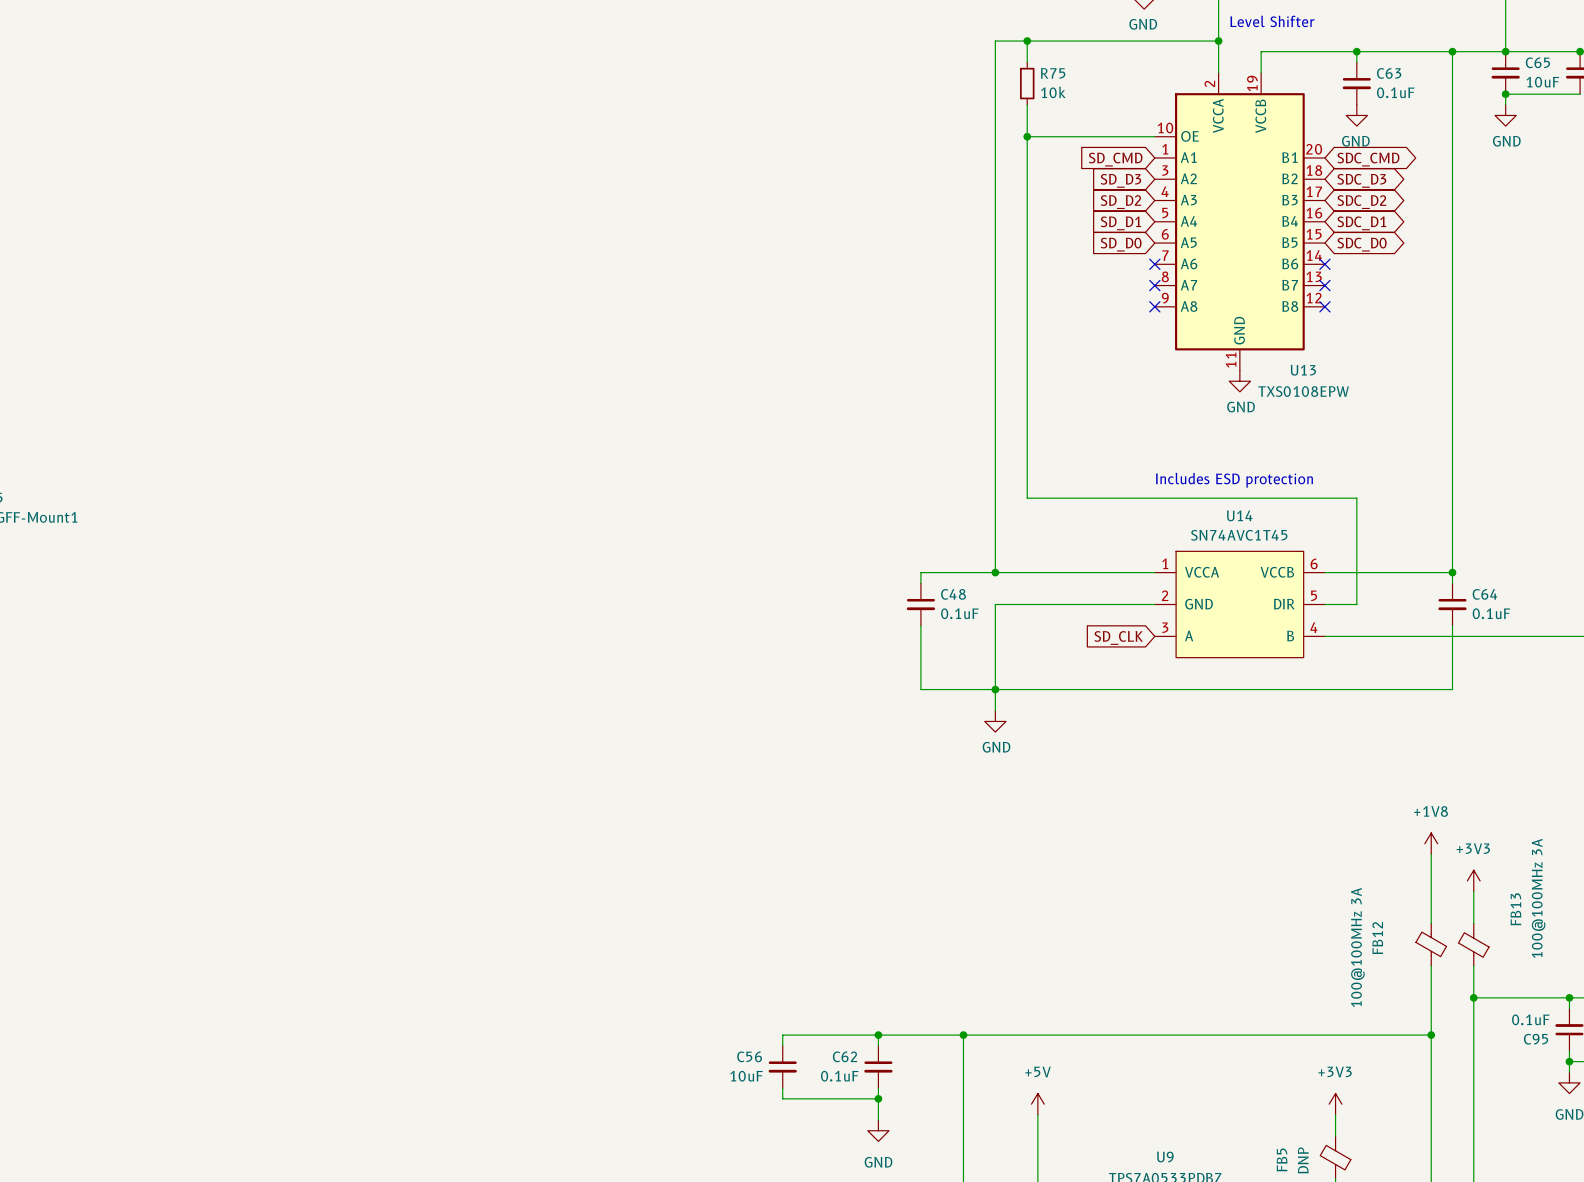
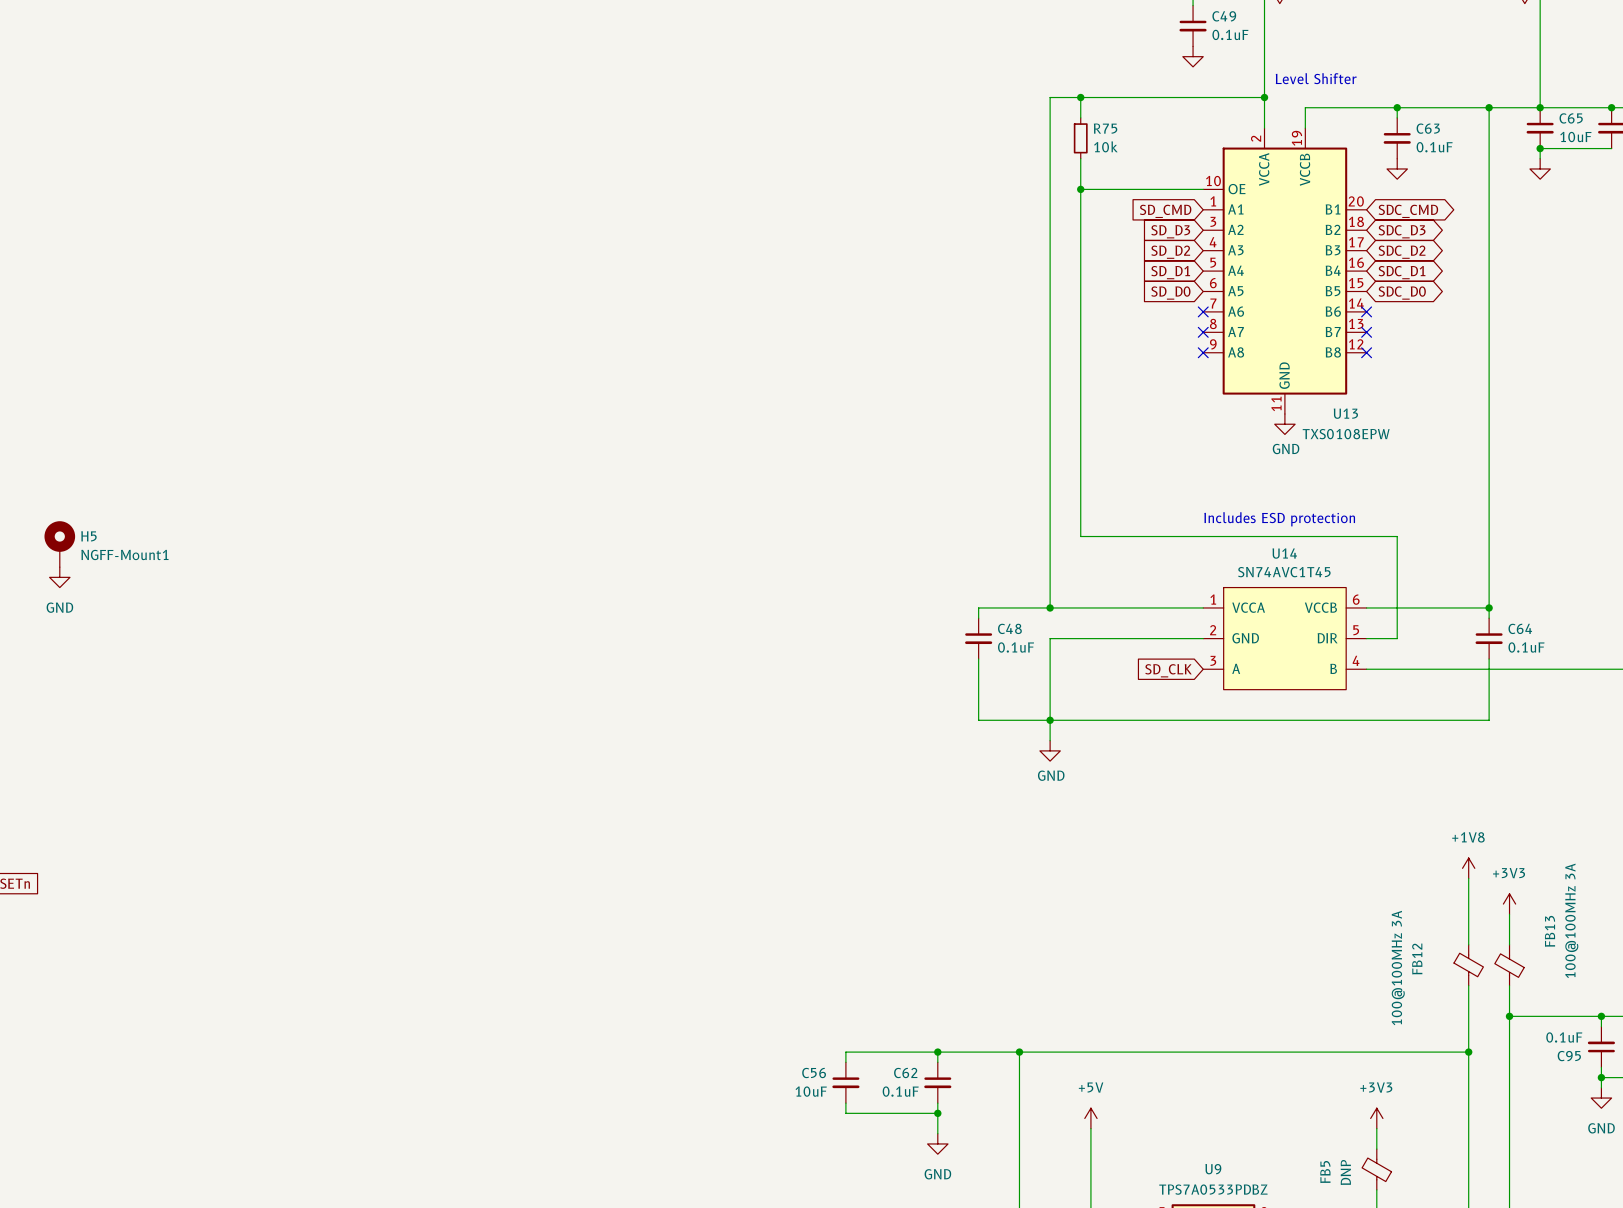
power symbol text: GND (1143, 24) -> none
power symbol text: GND (1355, 141) -> none
power symbol text: GND (1506, 141) -> none

